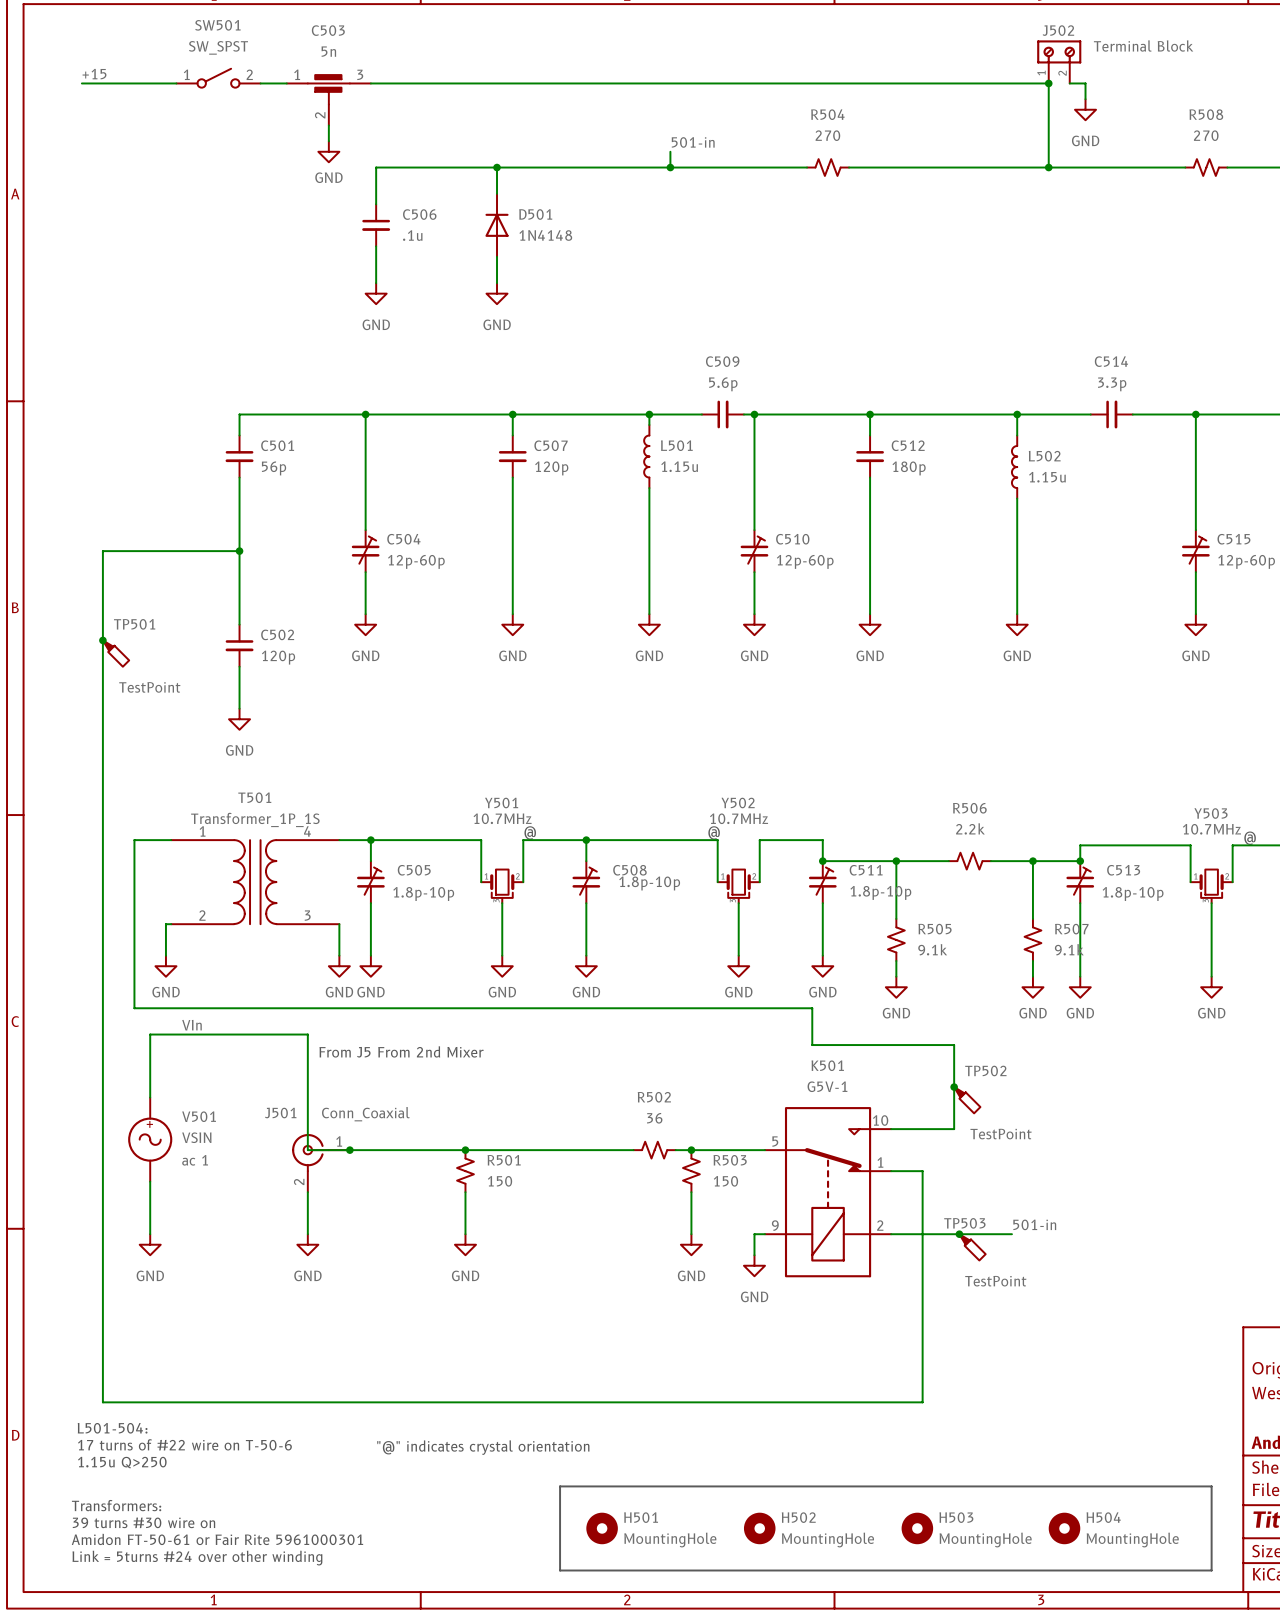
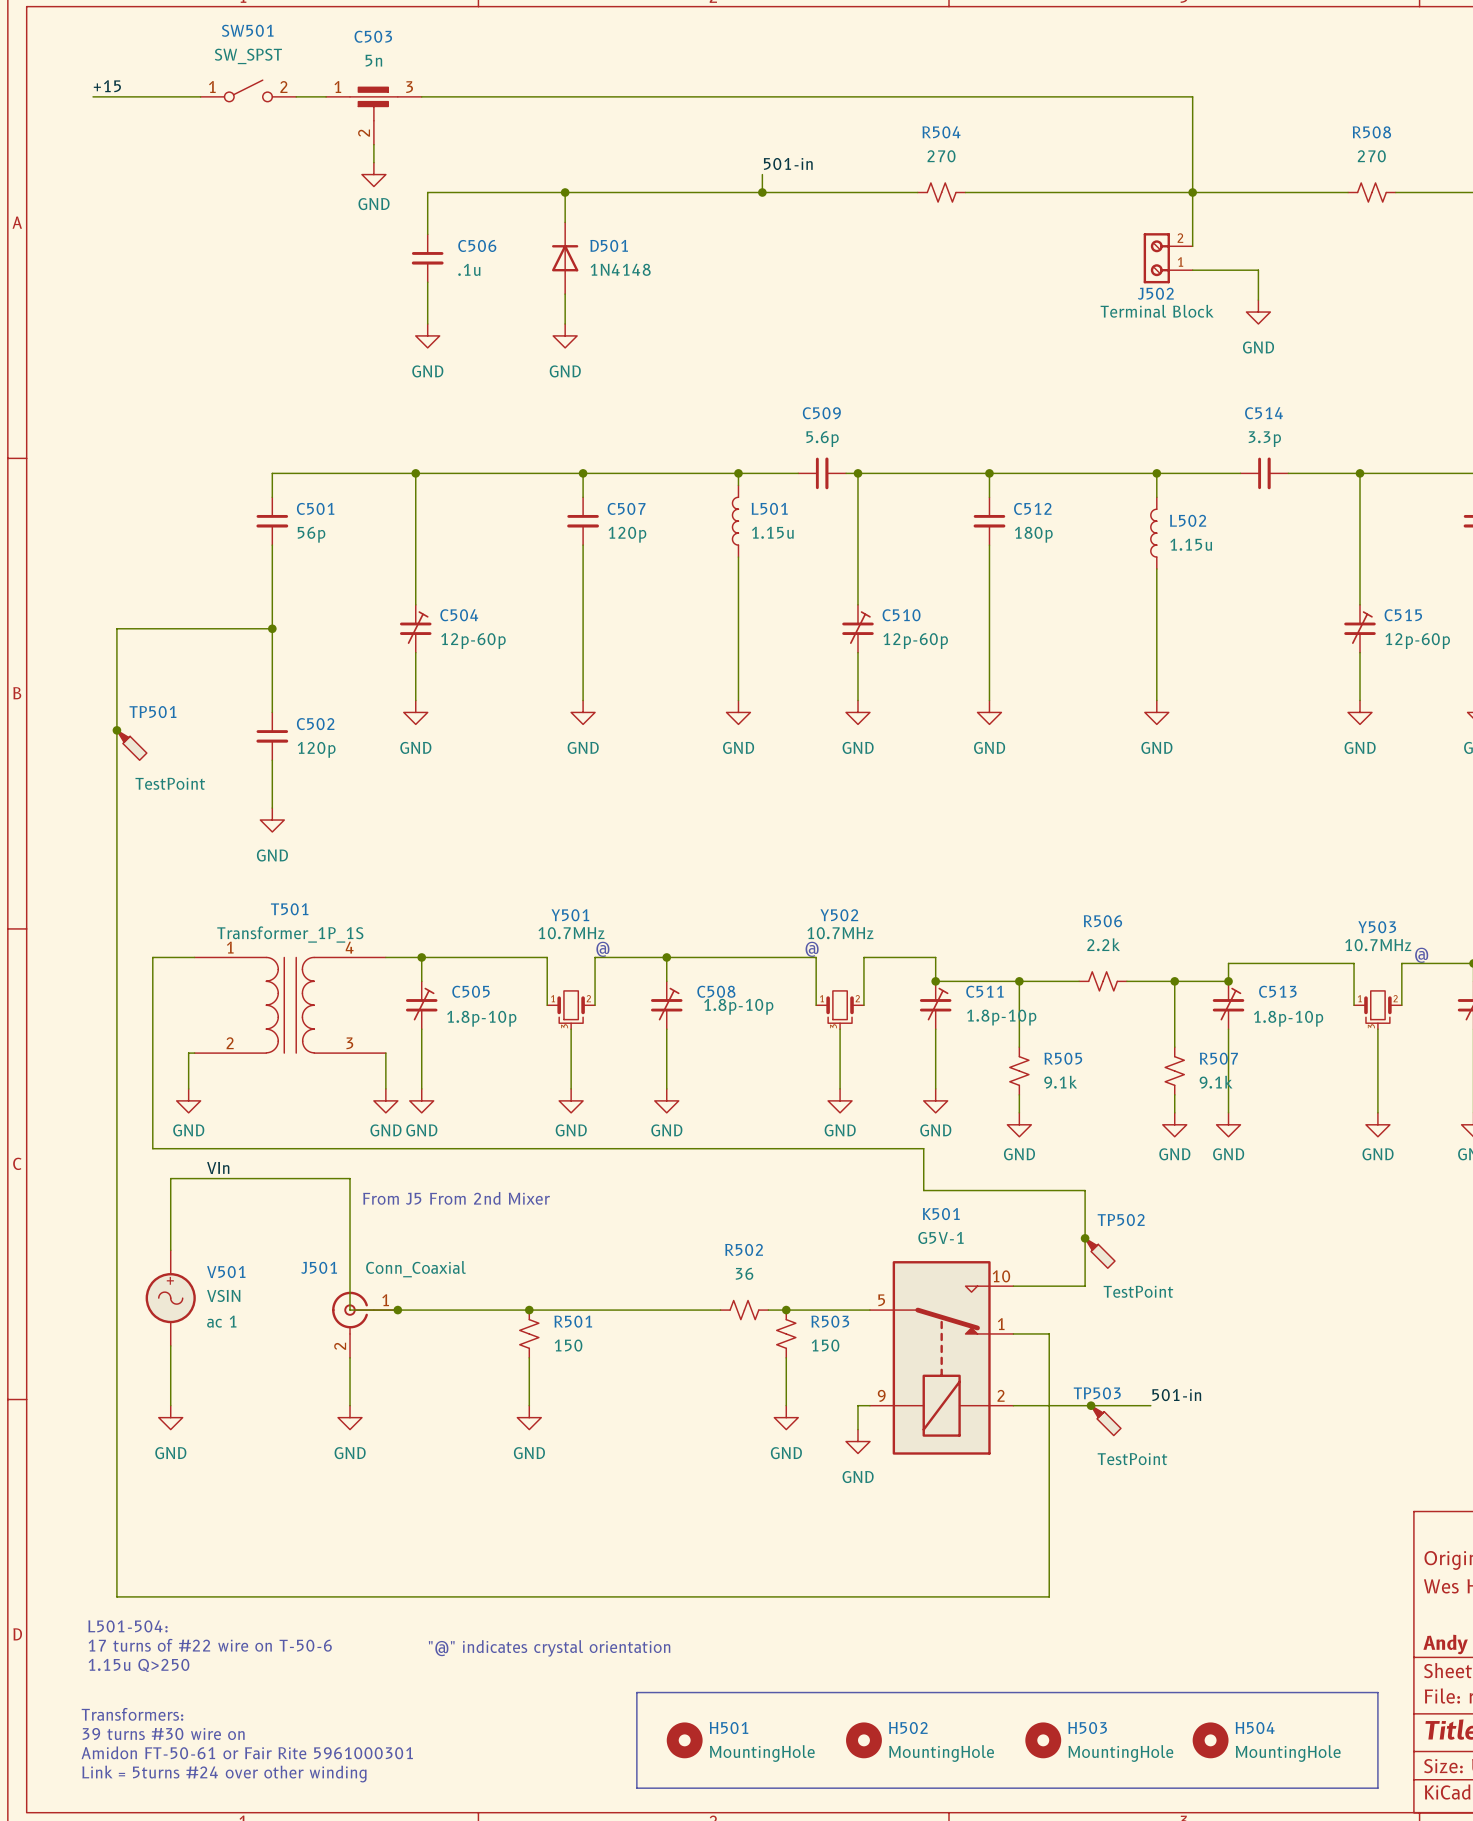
J502 name position: J502 (1058, 30) -> J502 (1155, 293)
J502 value position: Terminal Block (1143, 46) -> Terminal Block (1157, 311)
J502 rotation: 0° (1059, 51) -> 90° counterclockwise (1156, 258)
J502 position: (1059, 61) -> (1168, 258)
junction: (1048, 83) -> none
wire: (1069, 83) (1085, 83) (1085, 99) -> none
power symbol position: GND (1085, 109) -> GND (1258, 312)
wire: none -> (1192, 192) (1192, 246)
wire: none -> (1192, 270) (1258, 270) (1258, 300)

